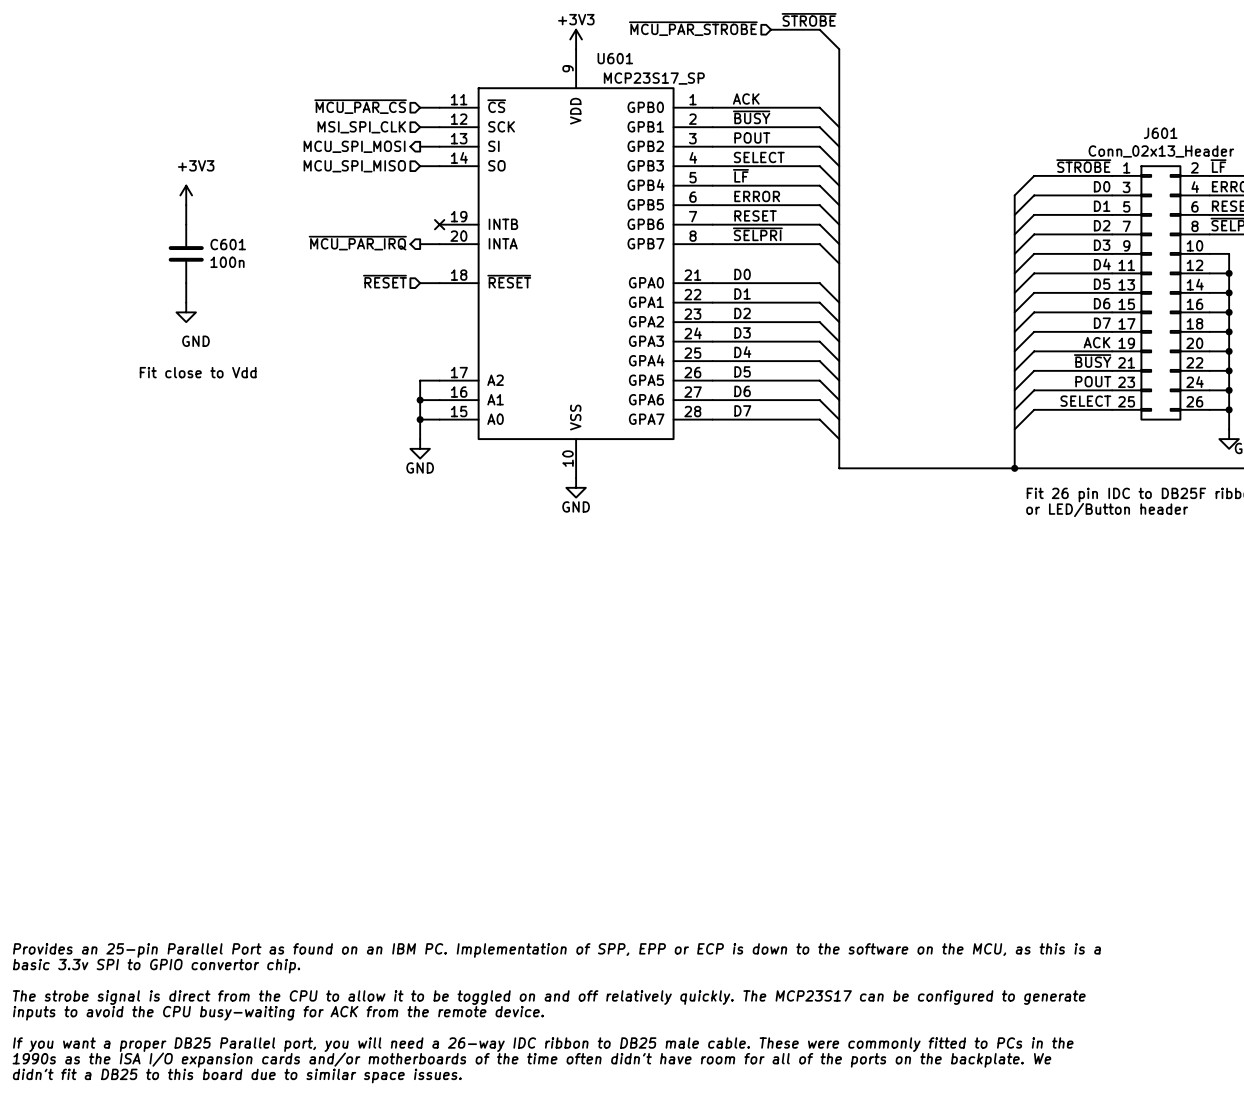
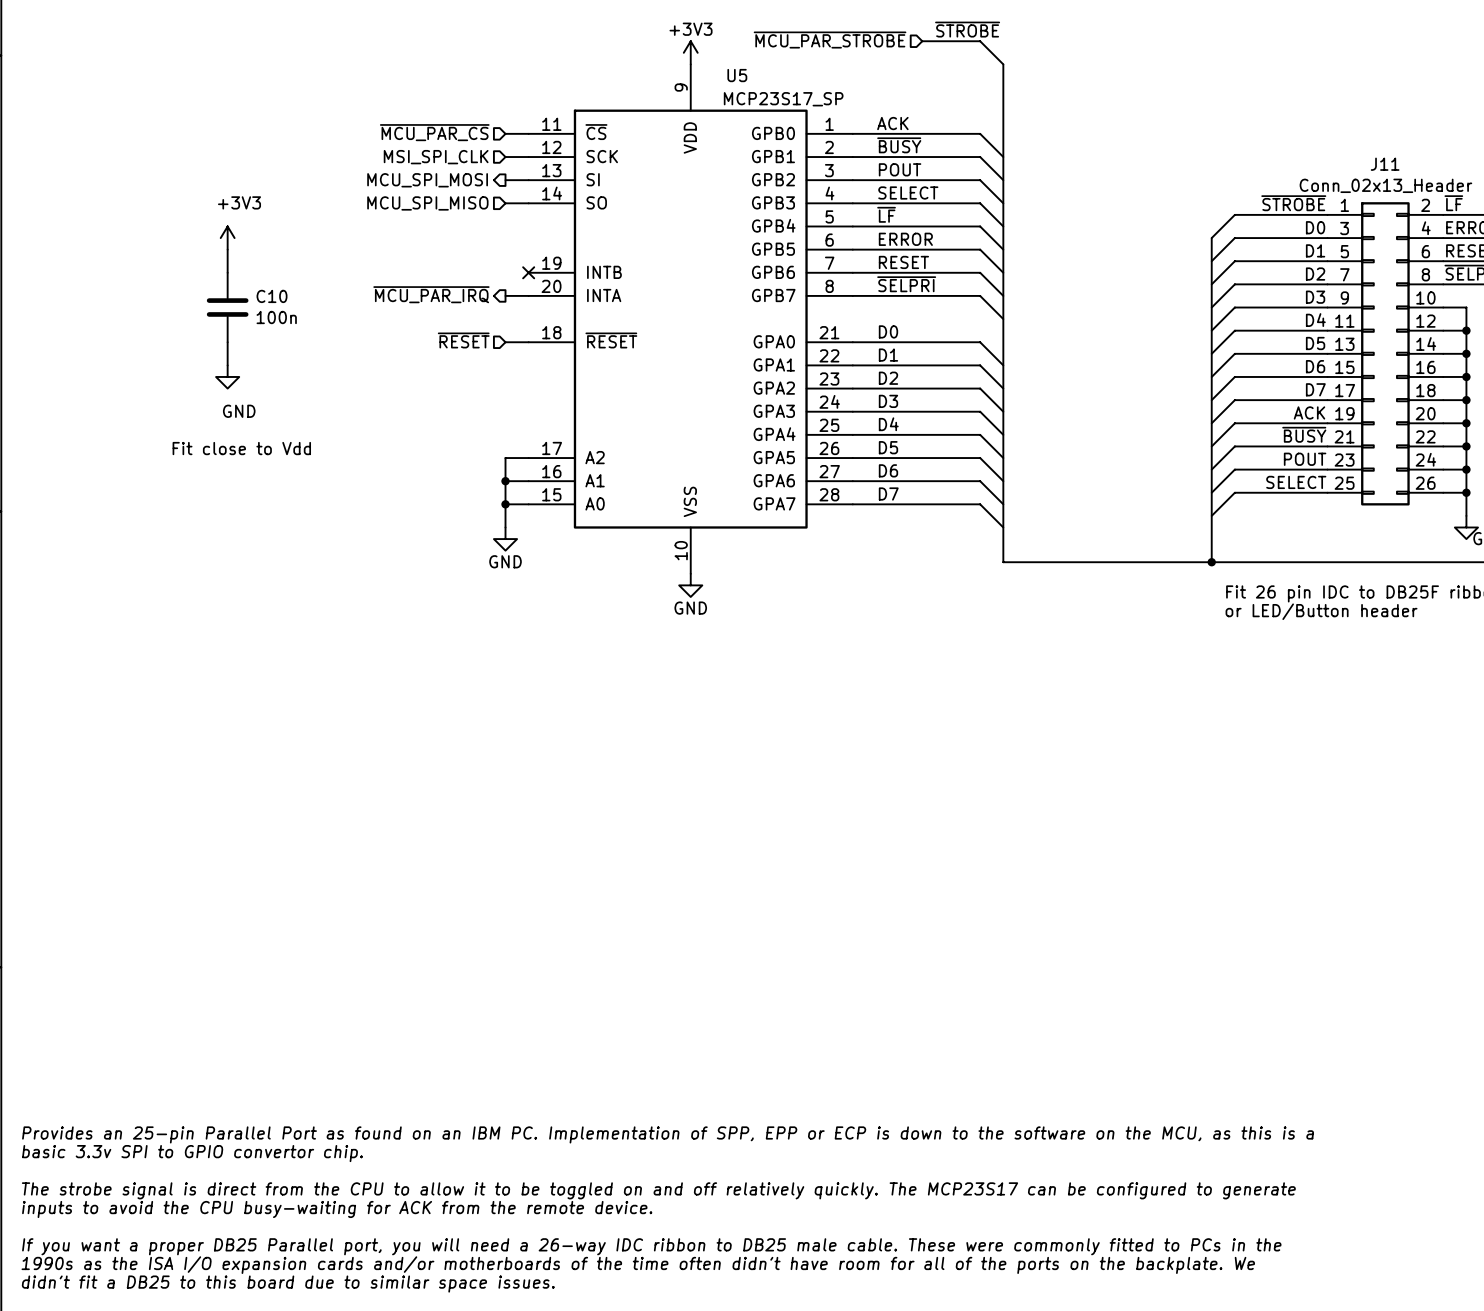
U601 name: U601 (615, 58) -> U5 (737, 75)
J601 name: J601 (1160, 133) -> J11 (1385, 164)
C601 name: C601 (228, 244) -> C10 (272, 296)

